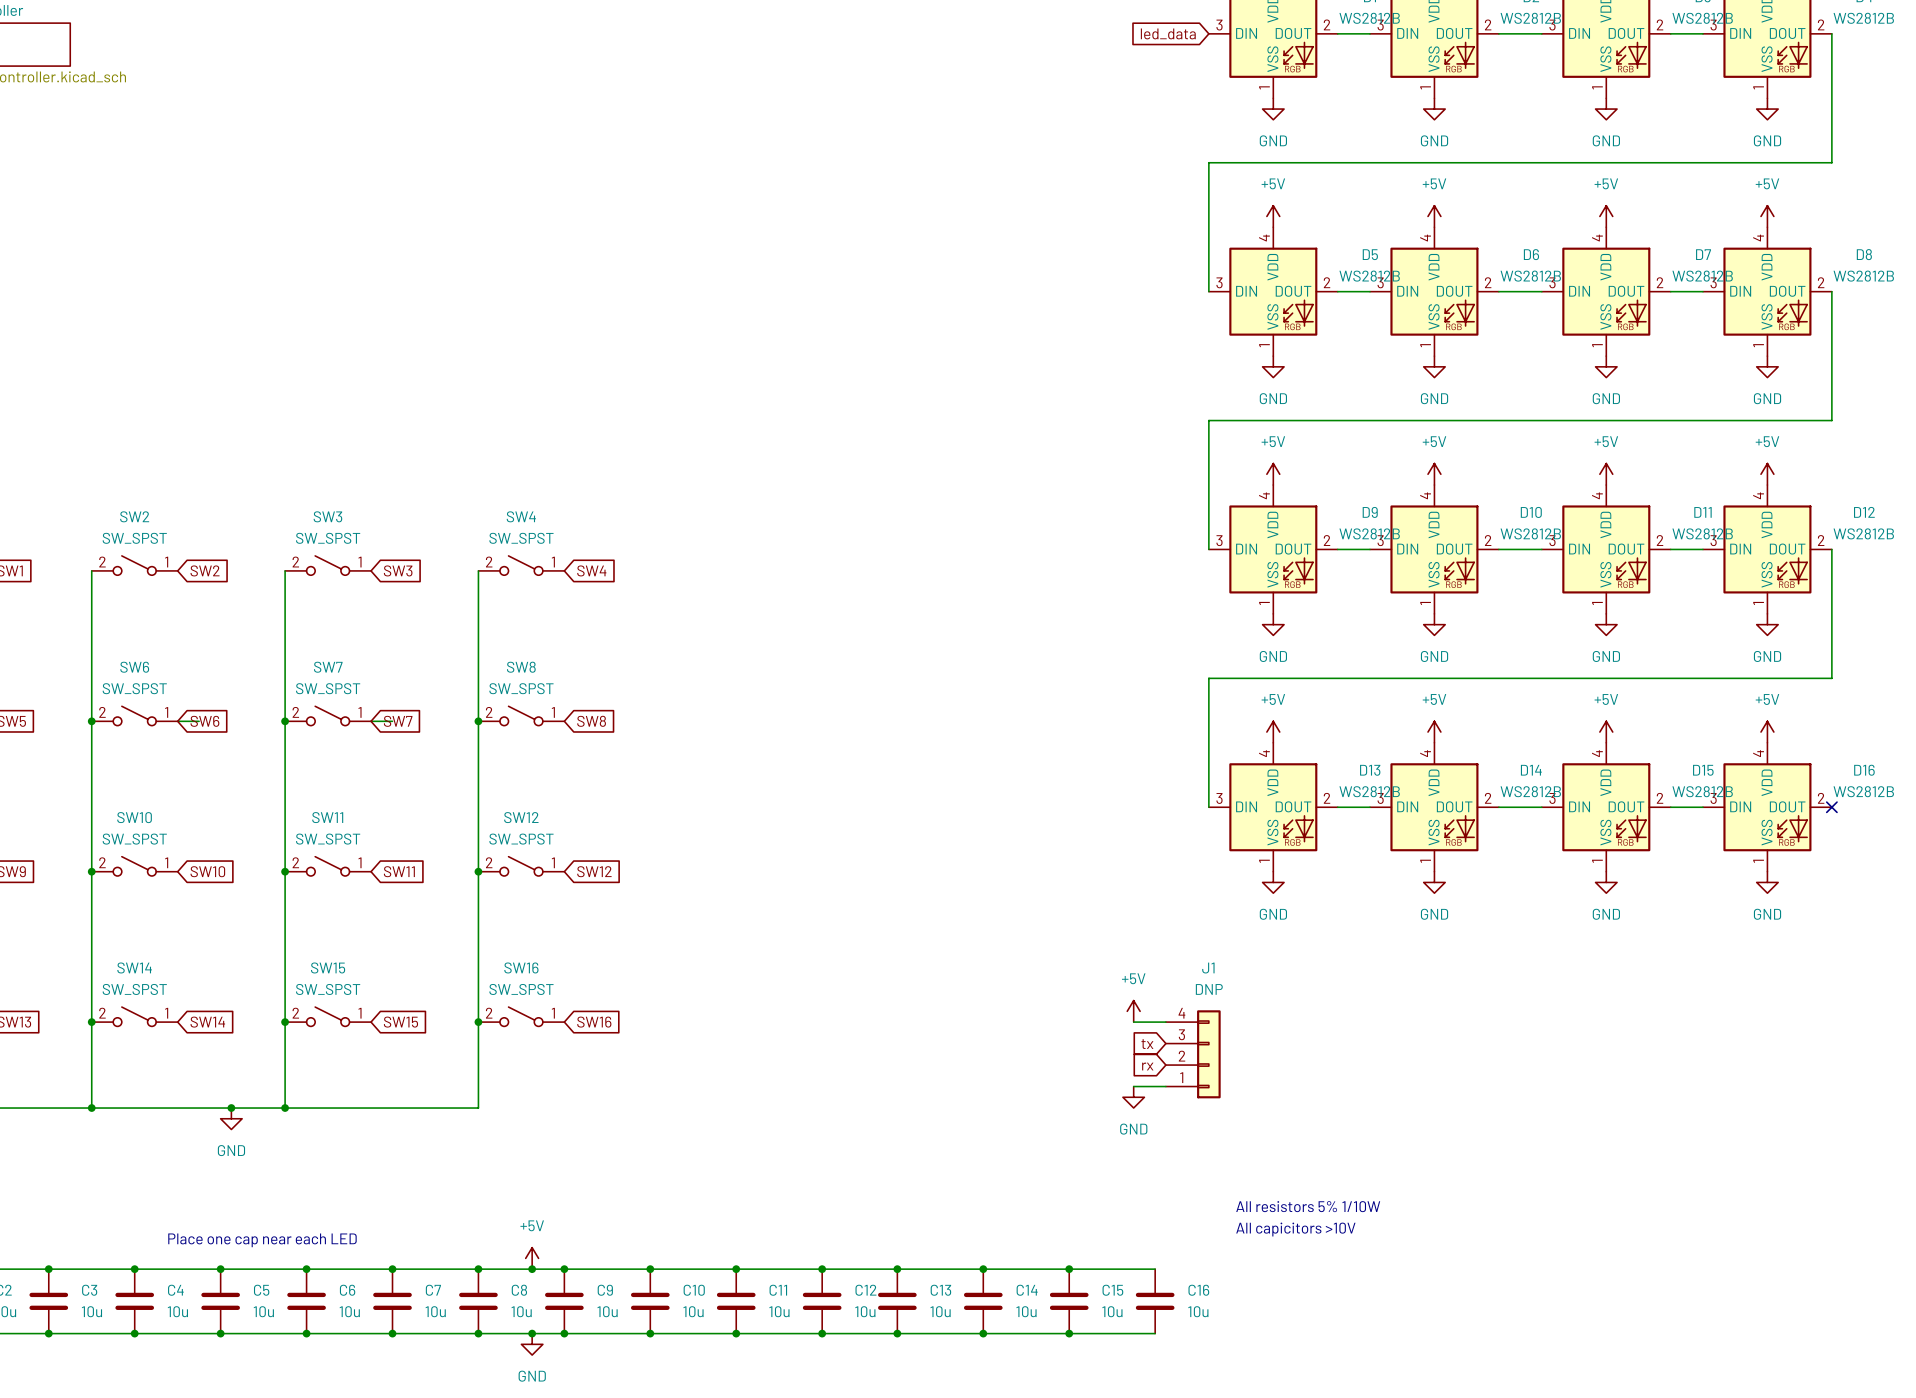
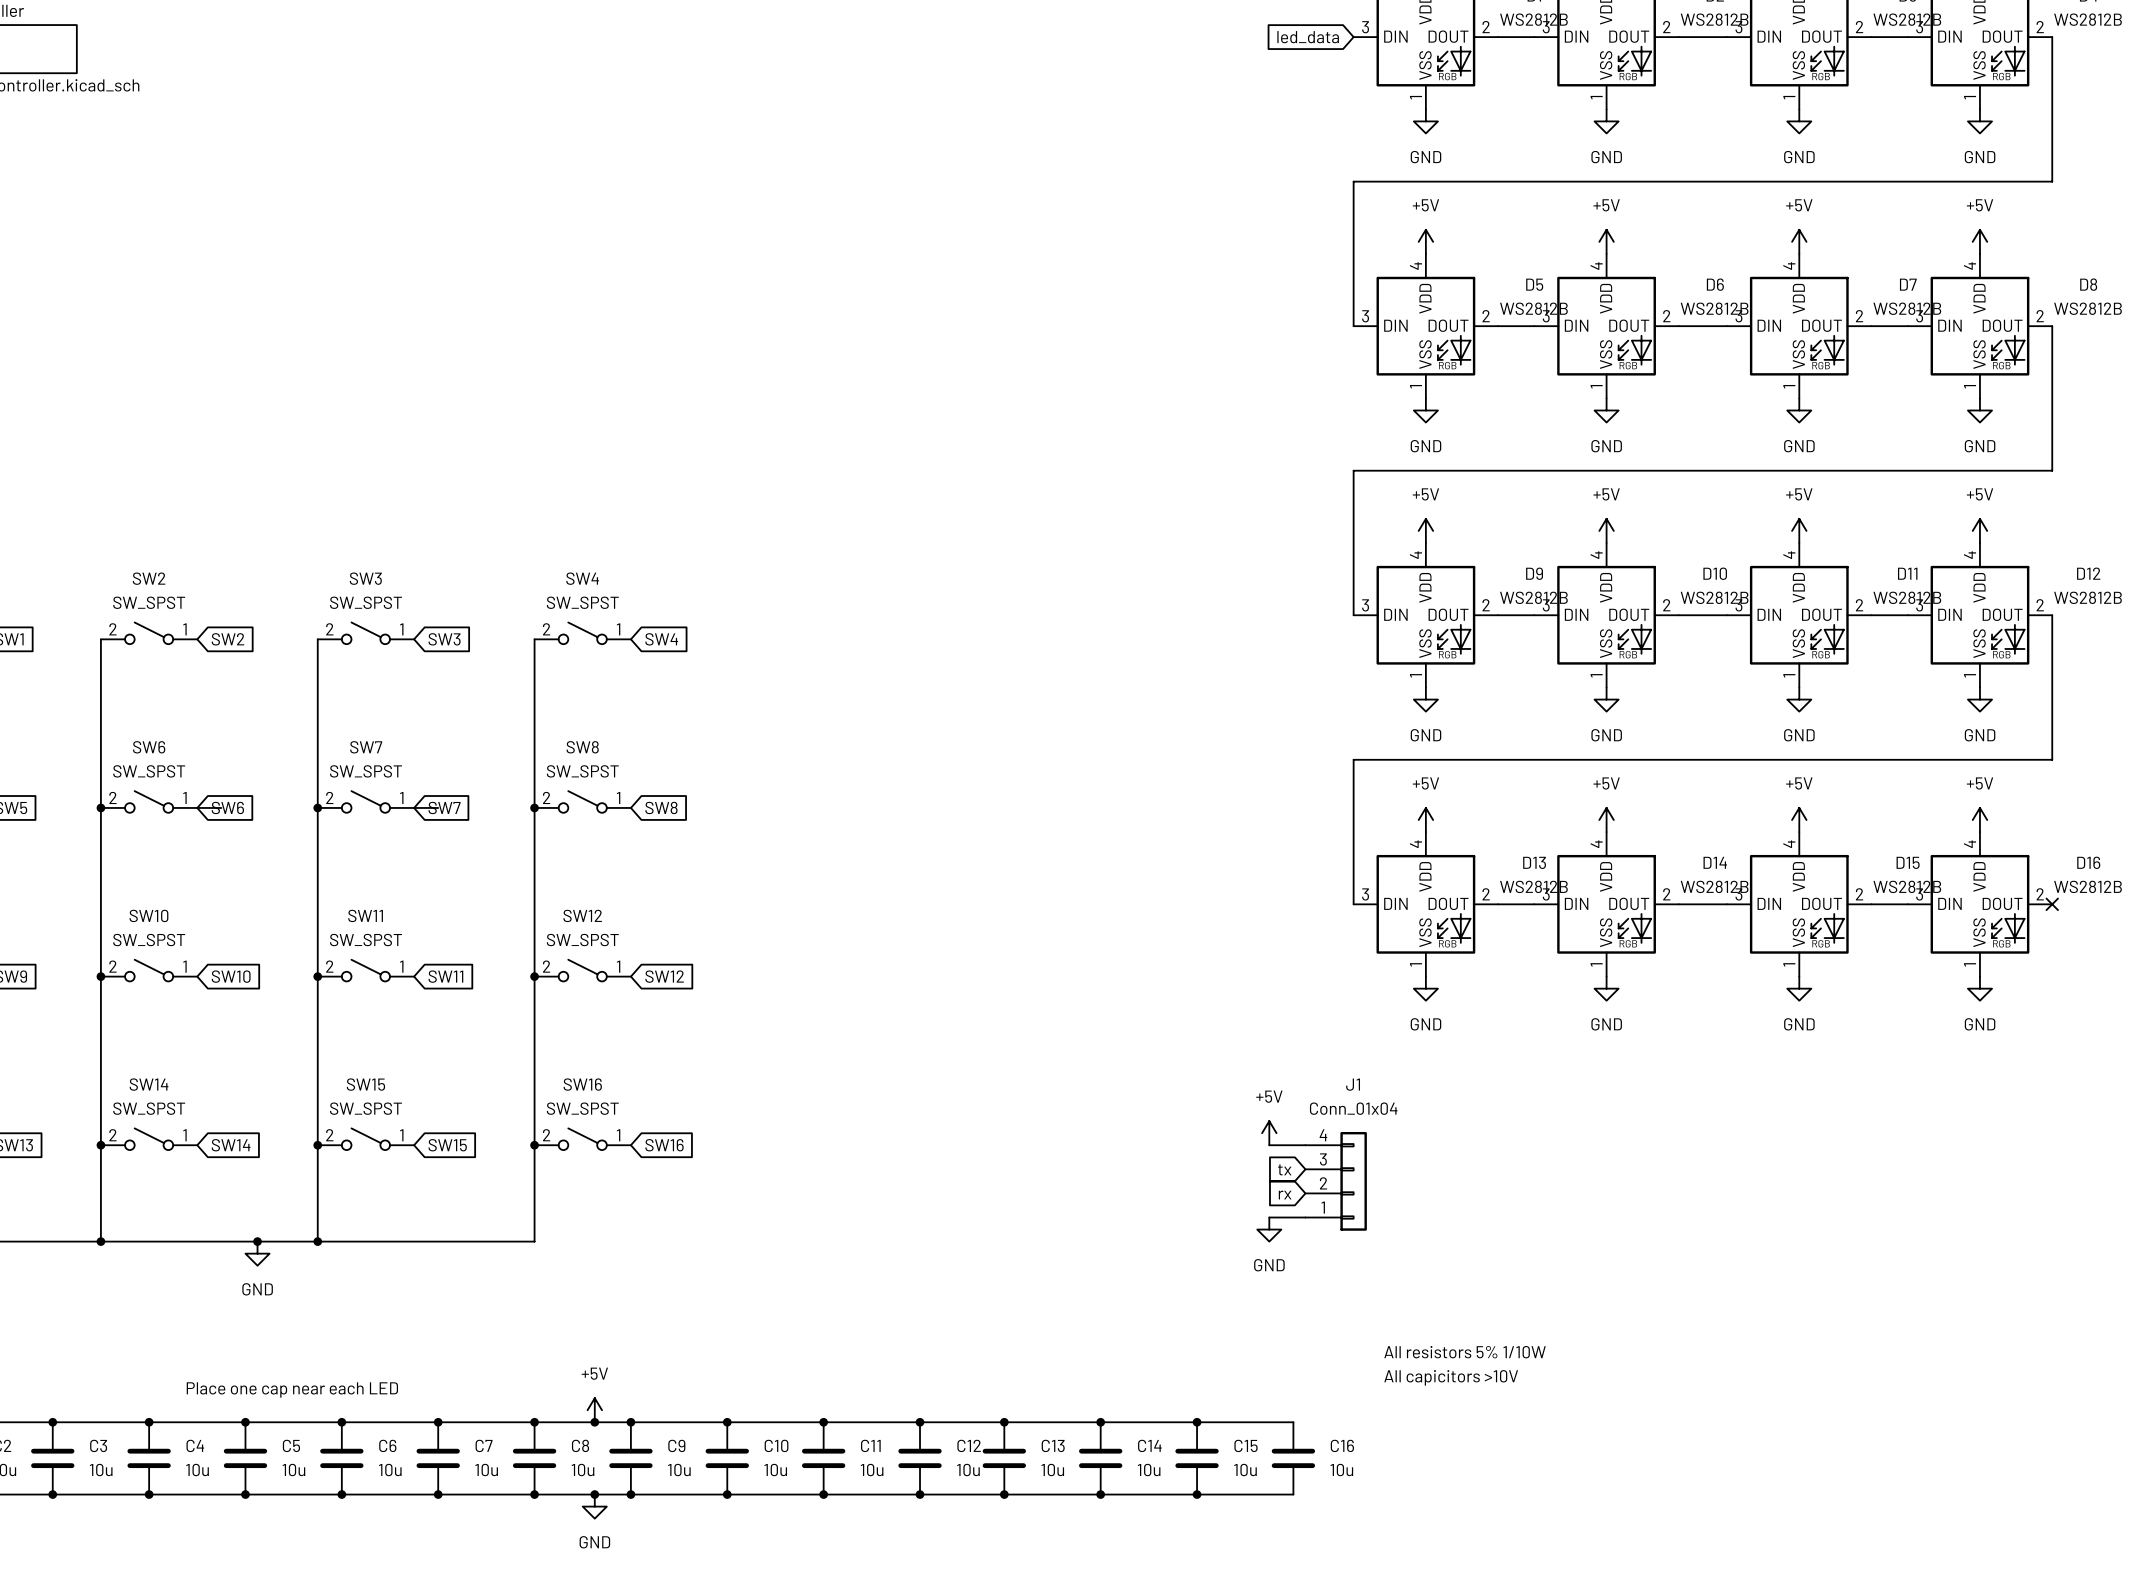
J1 value: DNP (1209, 989) -> Conn_01x04 (1353, 1108)

